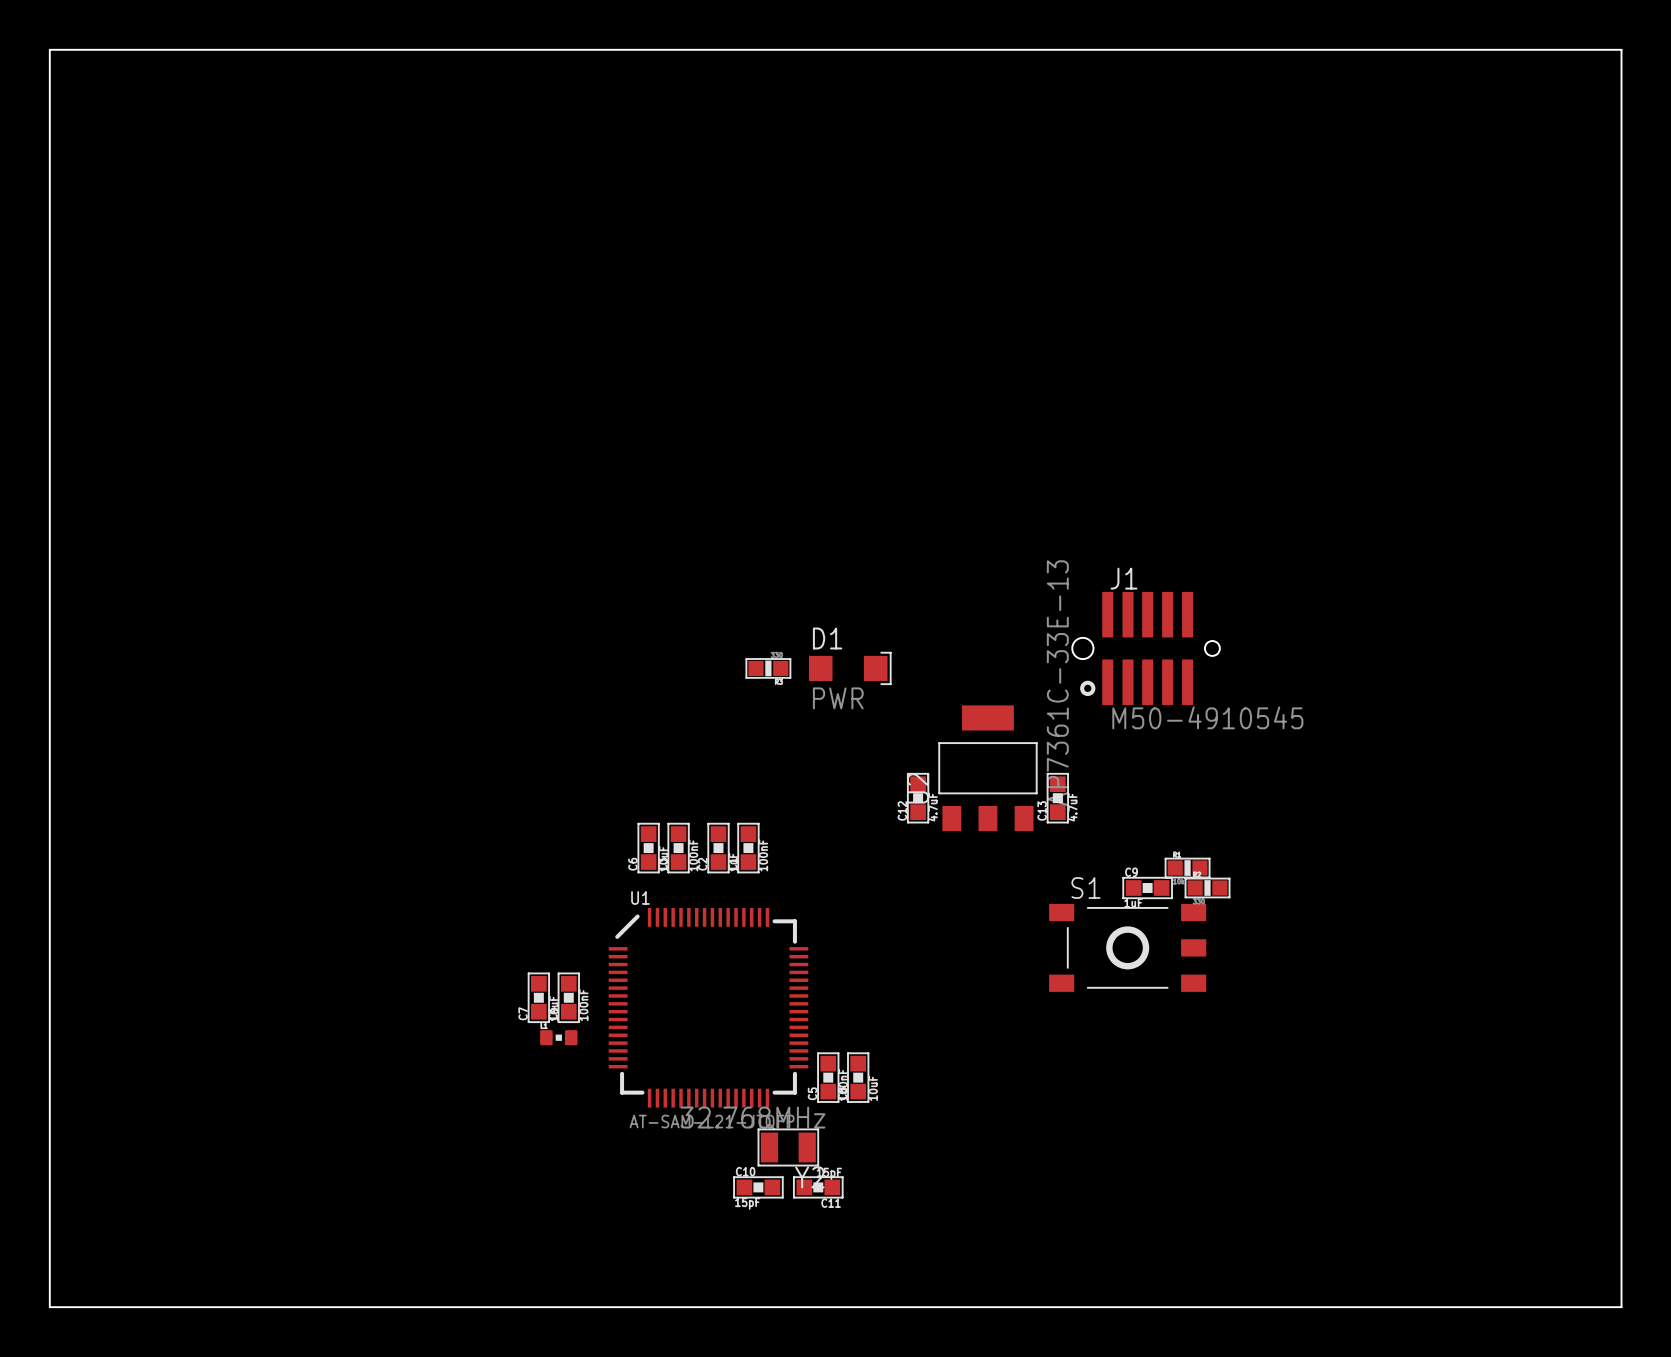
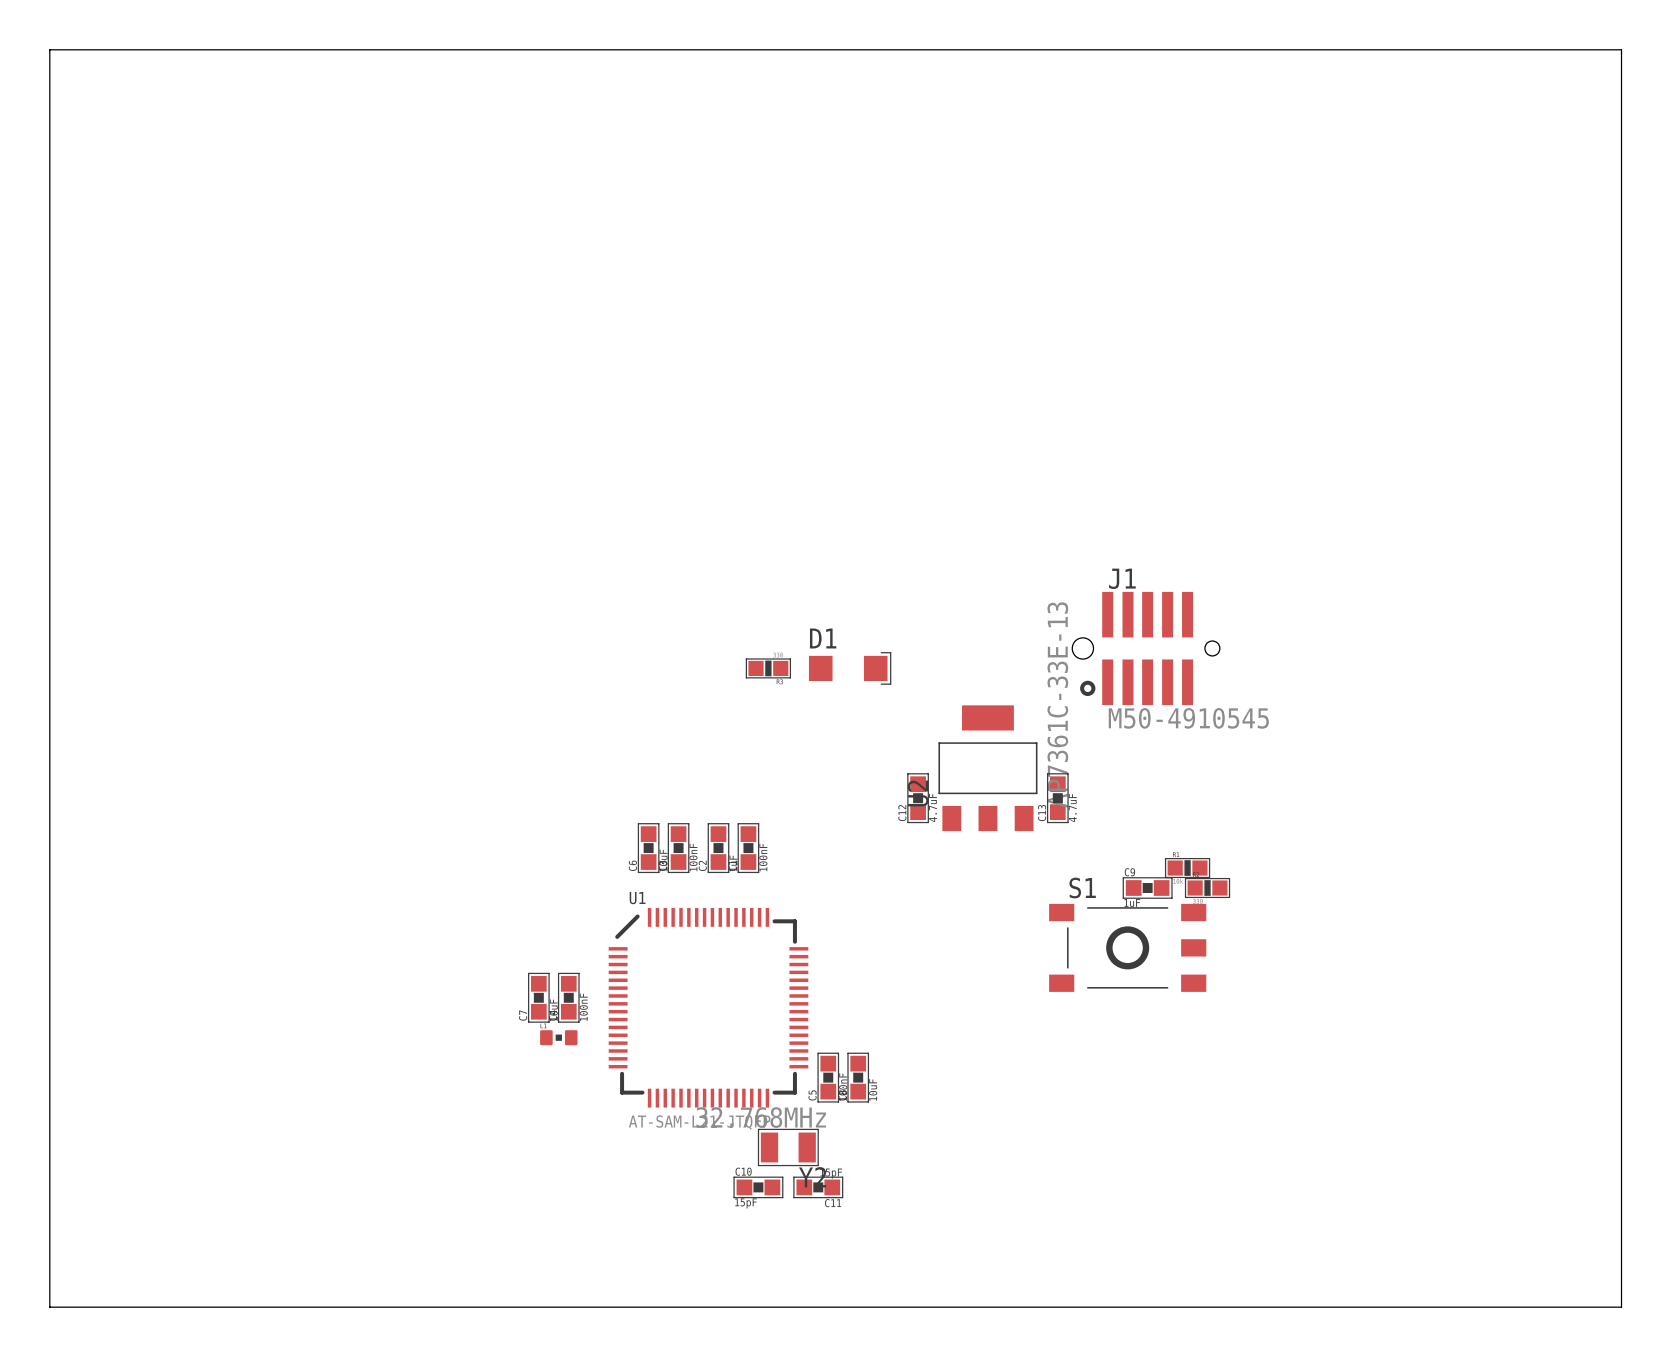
D1 value: PWR (838, 698) -> none

